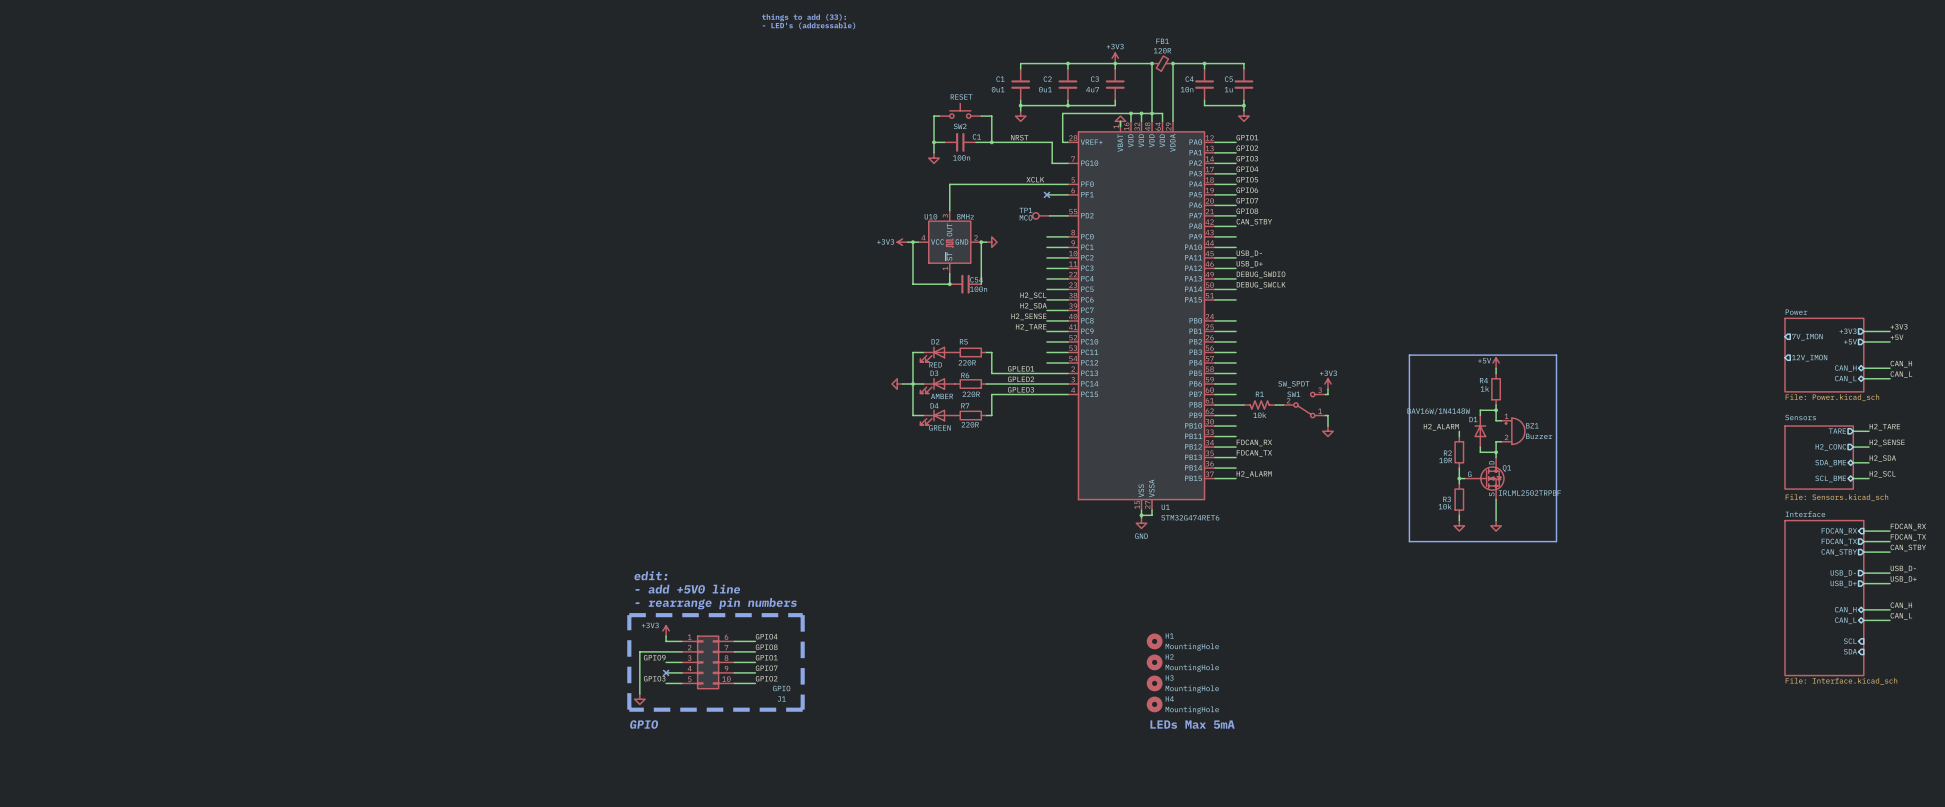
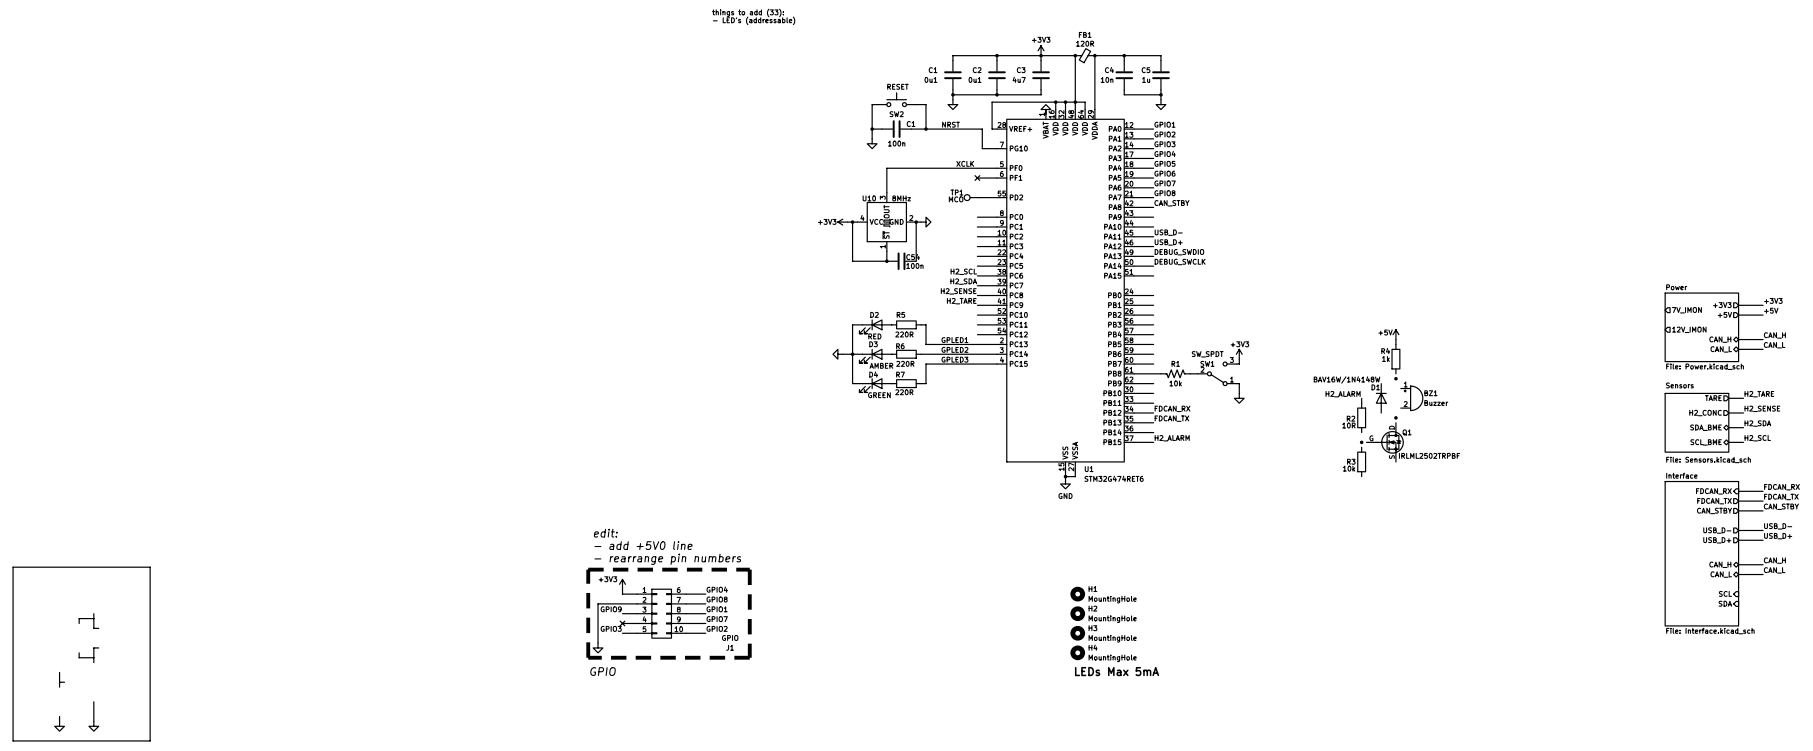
line: (1409, 355) (1556, 355) (1556, 541) (1409, 541) (1409, 355) -> none
wire: (1496, 405) (1496, 420) (1501, 420) -> none
wire: (1496, 410) (1480, 410) (1480, 415) -> none
wire: (1501, 441) (1496, 441) (1496, 457) -> none
wire: (1480, 447) (1480, 452) (1496, 452) -> none
wire: (1459, 468) (1459, 483) -> none
wire: (1459, 478) (1464, 478) -> none
wire: (1496, 499) (1496, 520) -> none
wire: (1459, 515) (1459, 520) -> none
power symbol: (1459, 525) -> none
power symbol: (1496, 525) -> none
line: none -> (13, 567) (150, 567) (150, 740) (13, 740) (13, 567)
wire: none -> (93, 613) (93, 628) (98, 628)
wire: none -> (93, 618) (79, 618) (79, 623)
wire: none -> (98, 647) (93, 647) (93, 662)
wire: none -> (79, 652) (79, 657) (93, 657)
wire: none -> (59, 672) (59, 687)
wire: none -> (59, 682) (64, 682)
wire: none -> (93, 701) (93, 721)
wire: none -> (59, 716) (59, 721)
power symbol: none -> (59, 726)
power symbol: none -> (93, 726)

